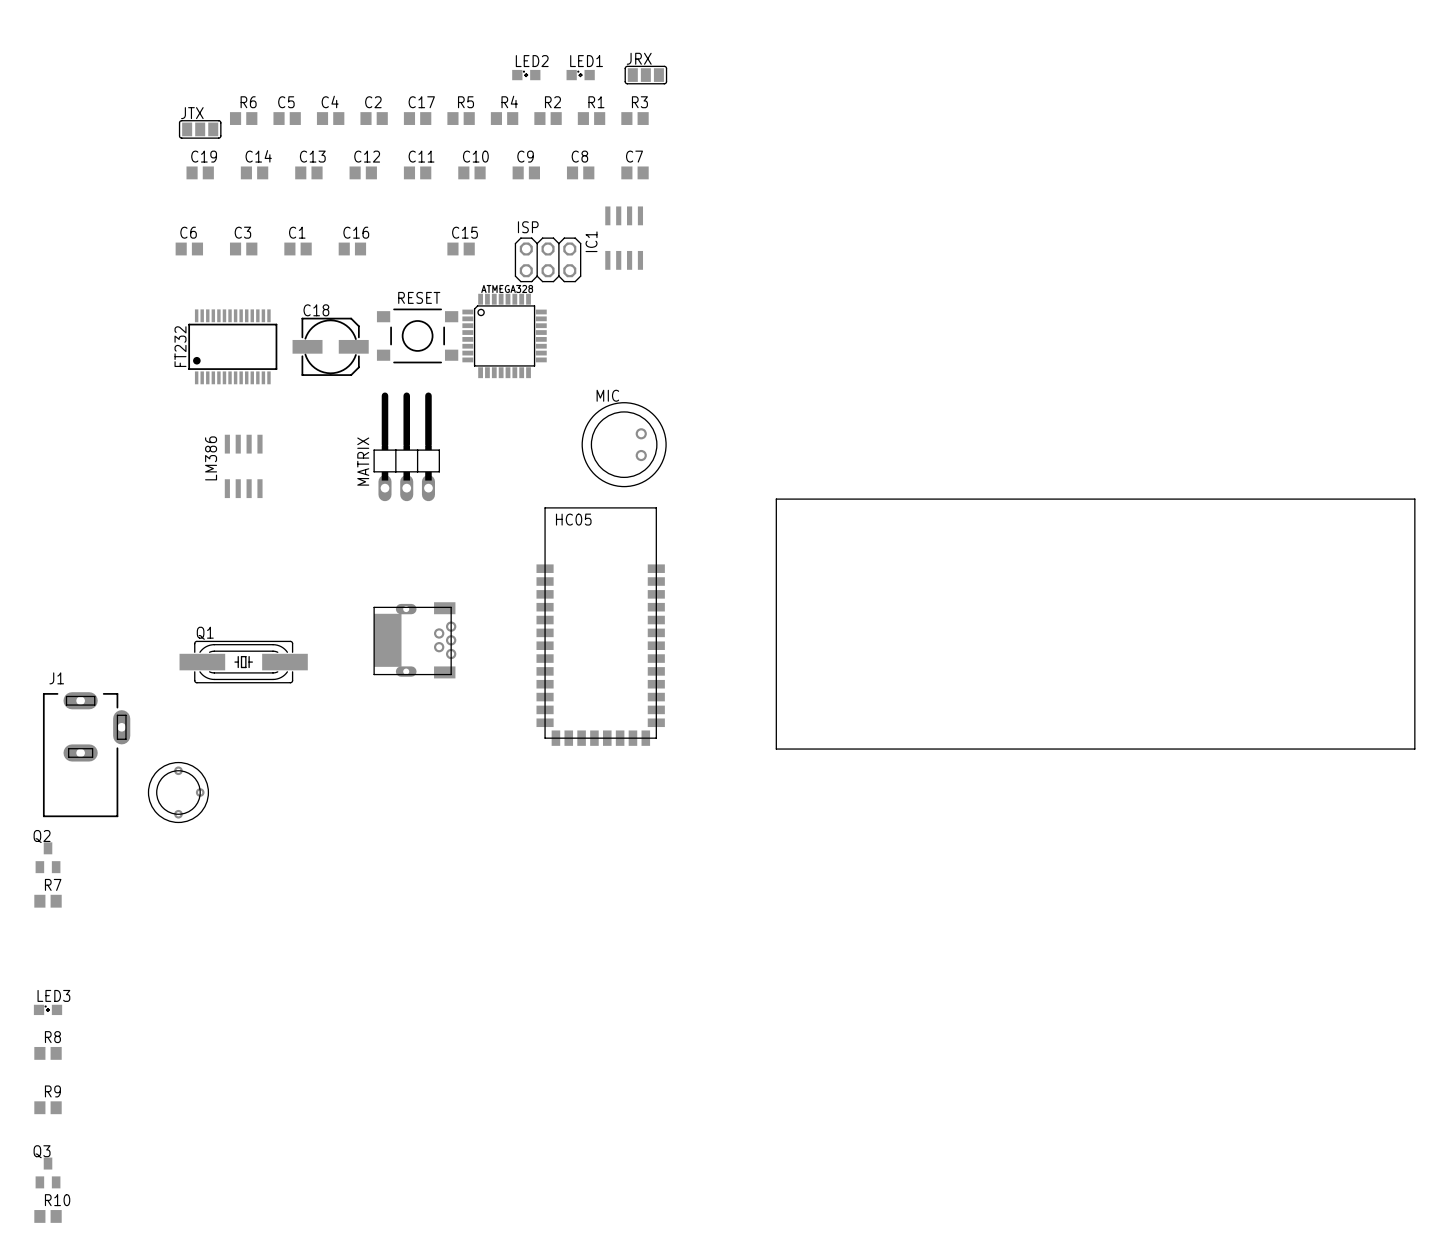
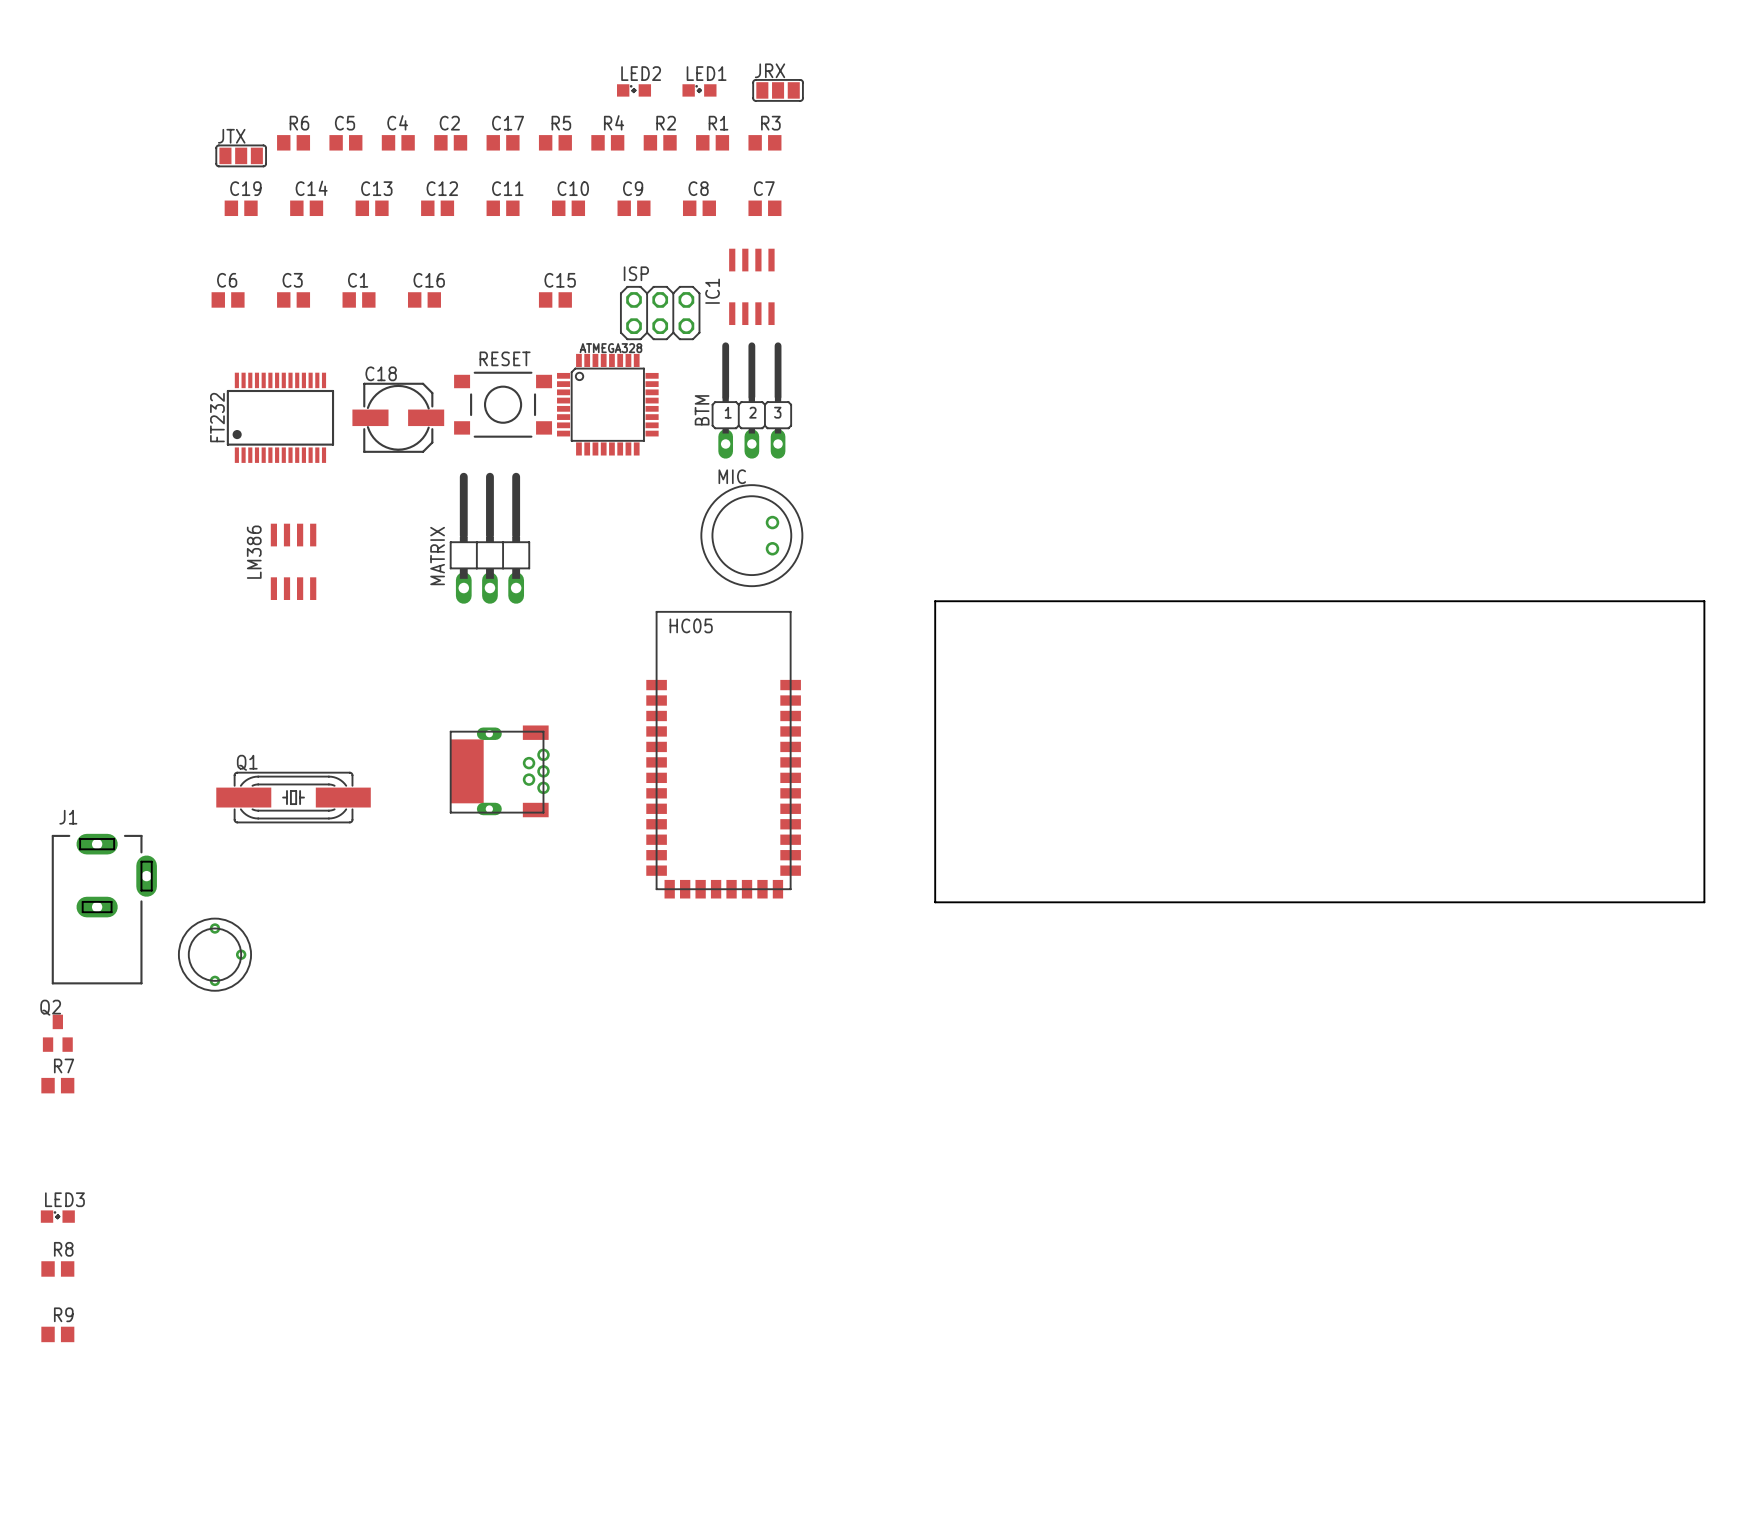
BTM: none -> (751, 400)
Q3: (48, 1172) -> none
R10: (48, 1216) -> none

